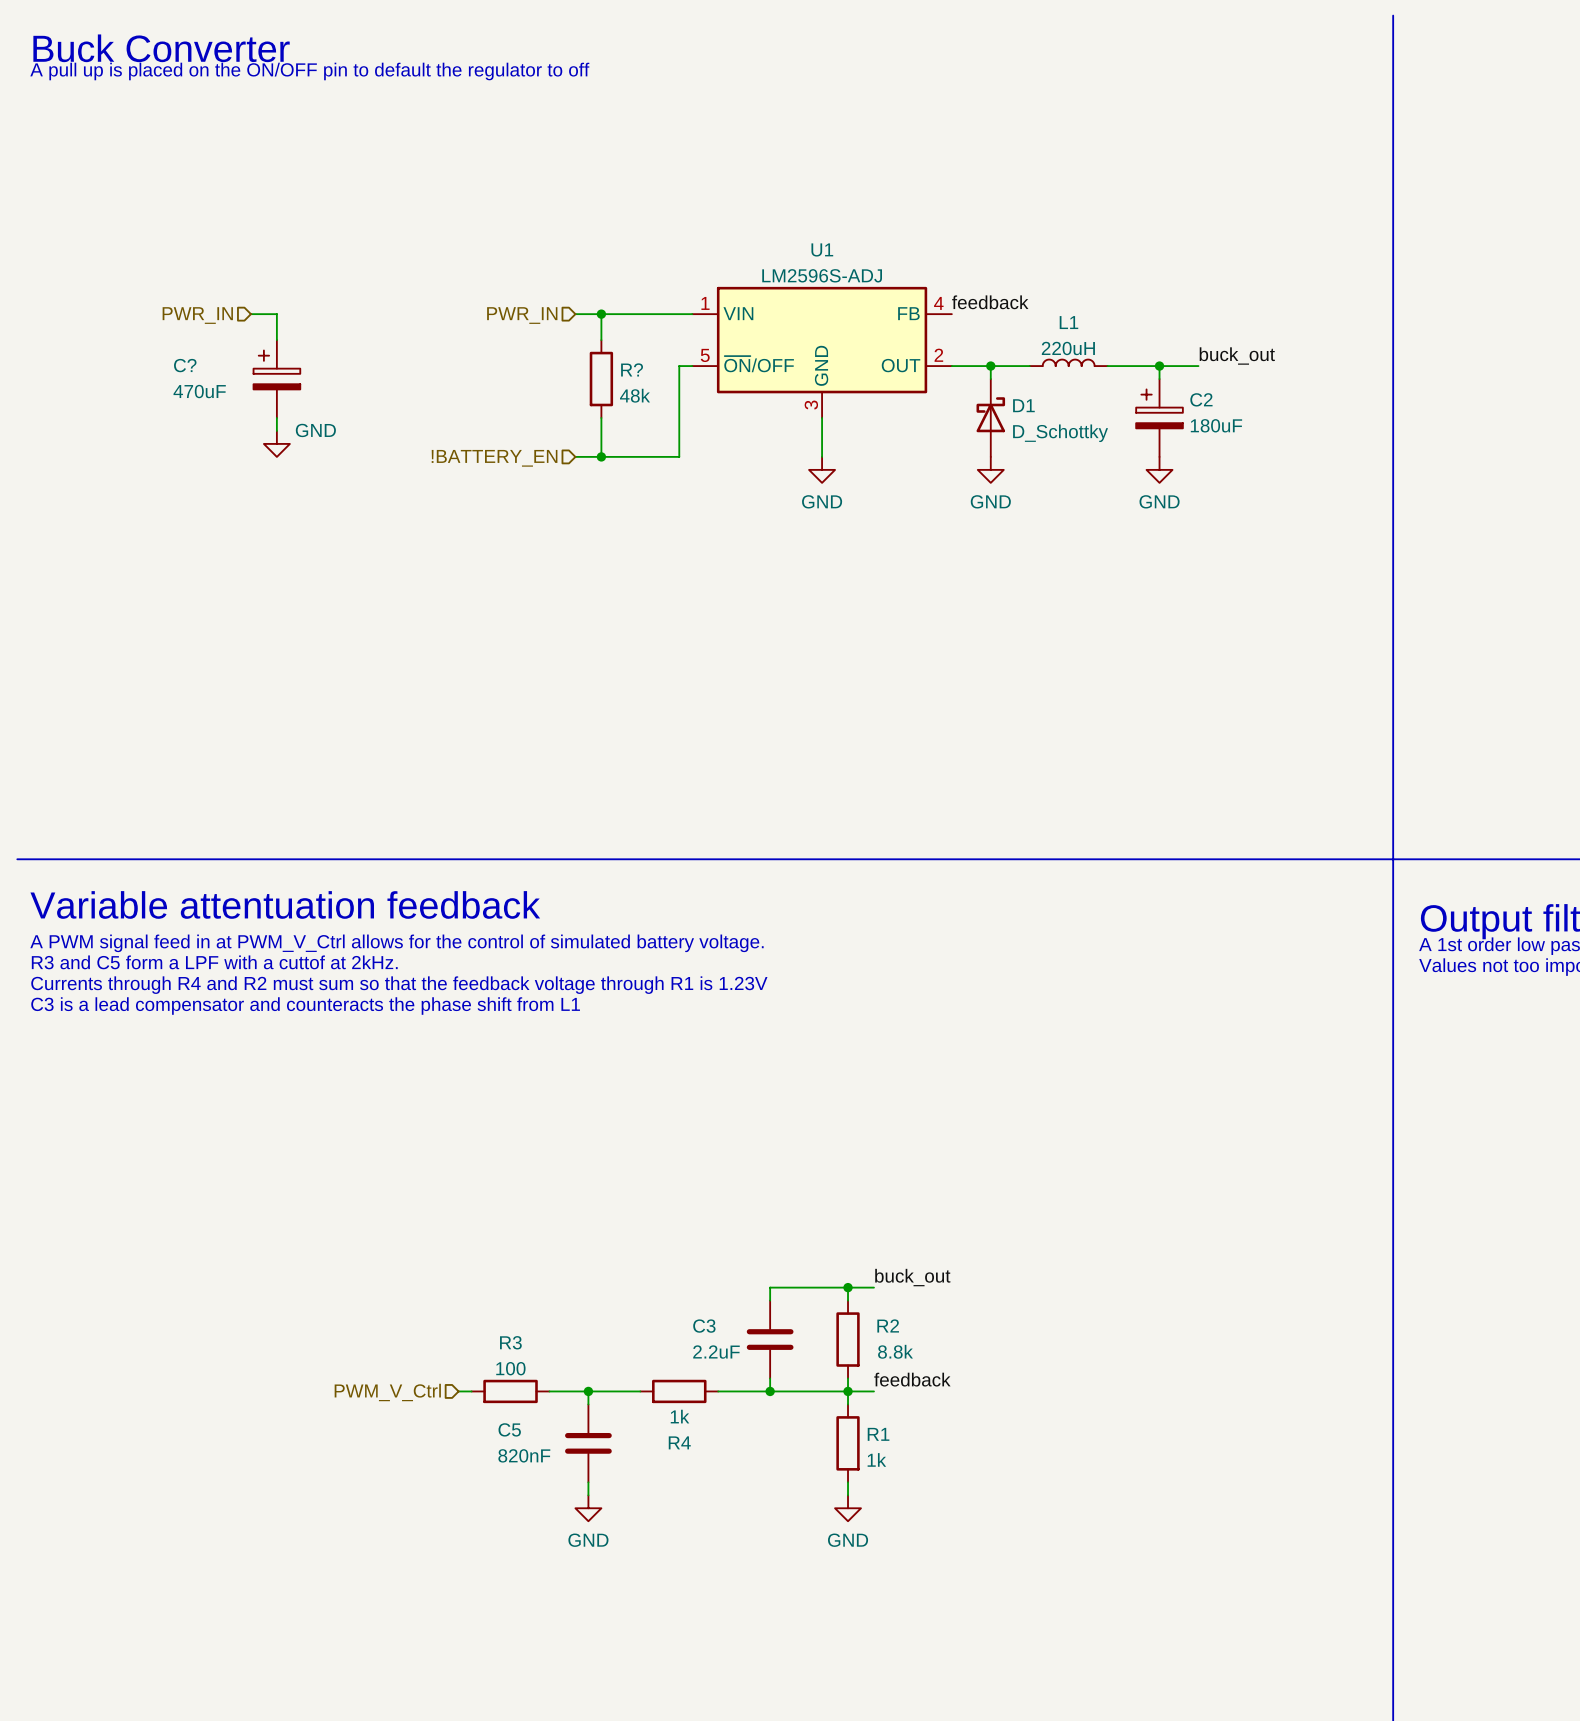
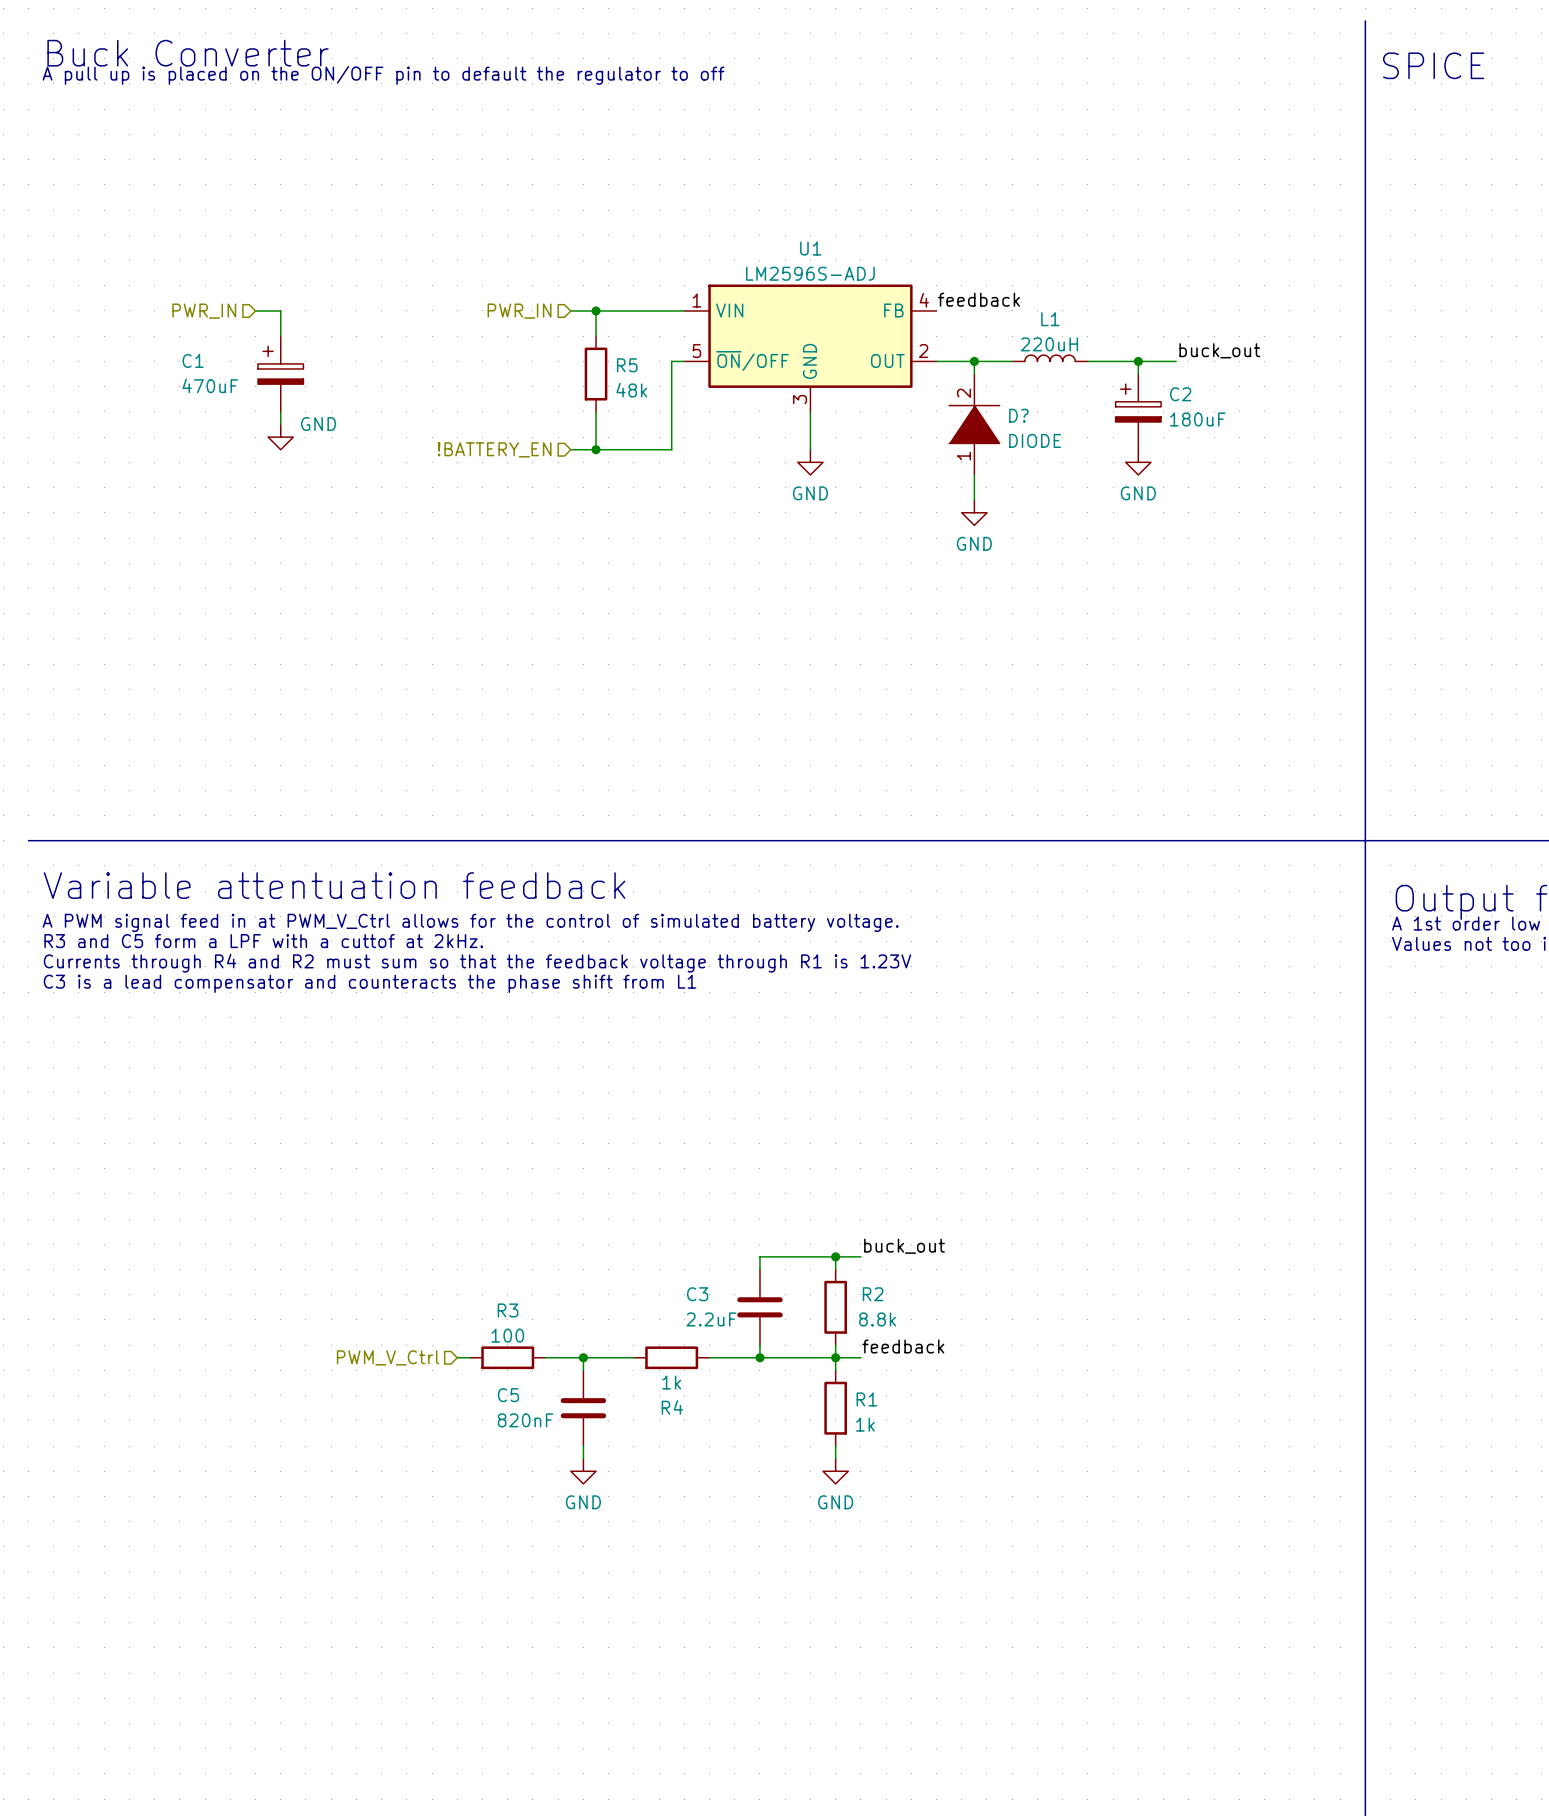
text: none -> SPICE (1433, 65)
C? name: C? (185, 365) -> C1 (193, 360)
R? name: R? (632, 369) -> R5 (627, 365)
D1: D_Schottky (990, 417) -> none
D?: none -> DIODE (974, 424)
power symbol position: GND (990, 469) -> GND (974, 512)
wire: none -> (974, 474) (974, 500)

